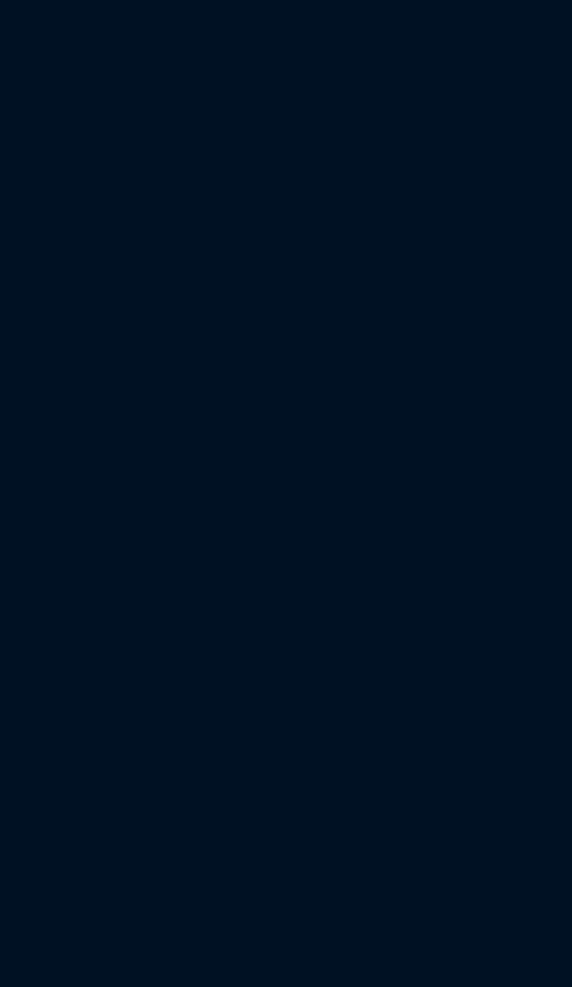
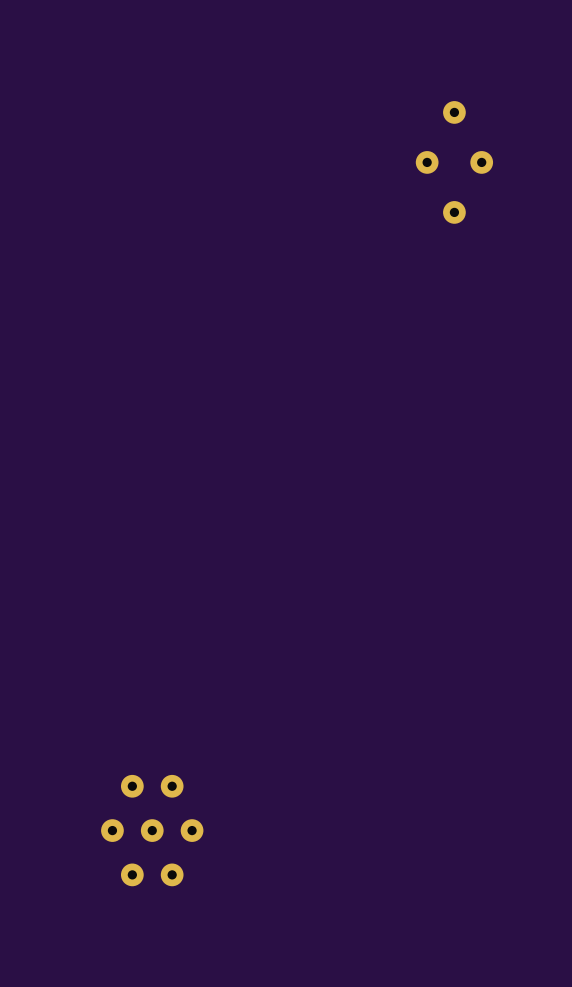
part: none -> (454, 162)
part: none -> (152, 830)

